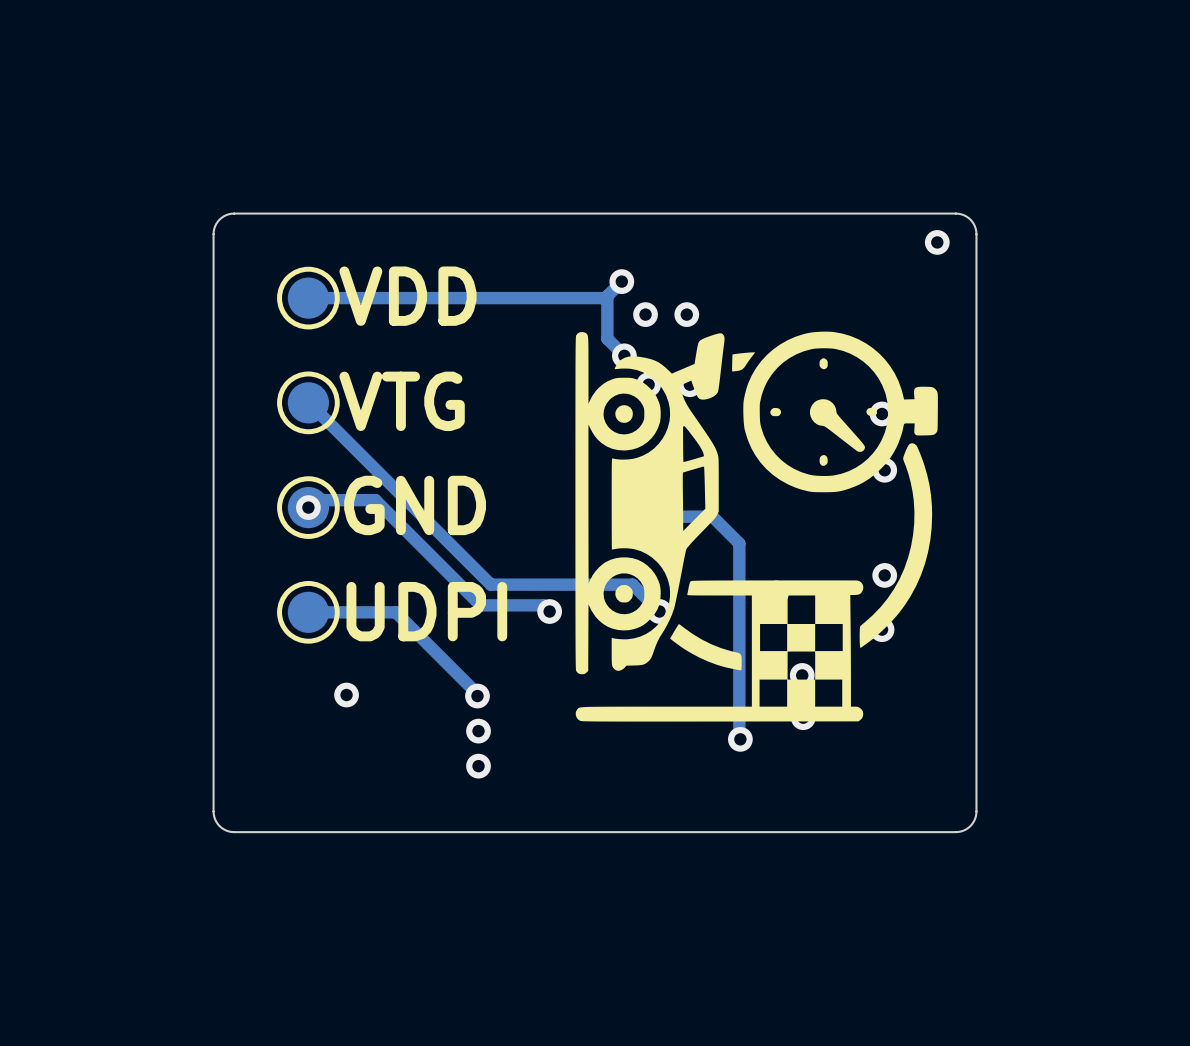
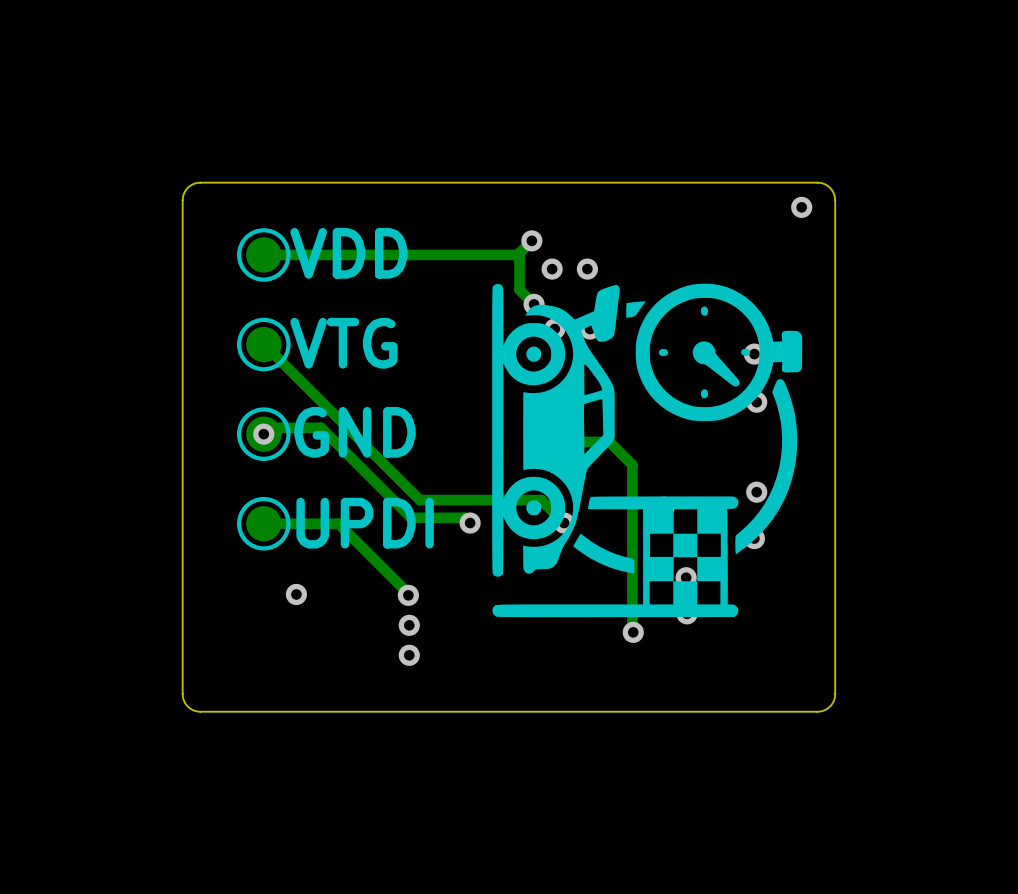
text: UDPI (426, 611) -> UPDI (365, 523)

